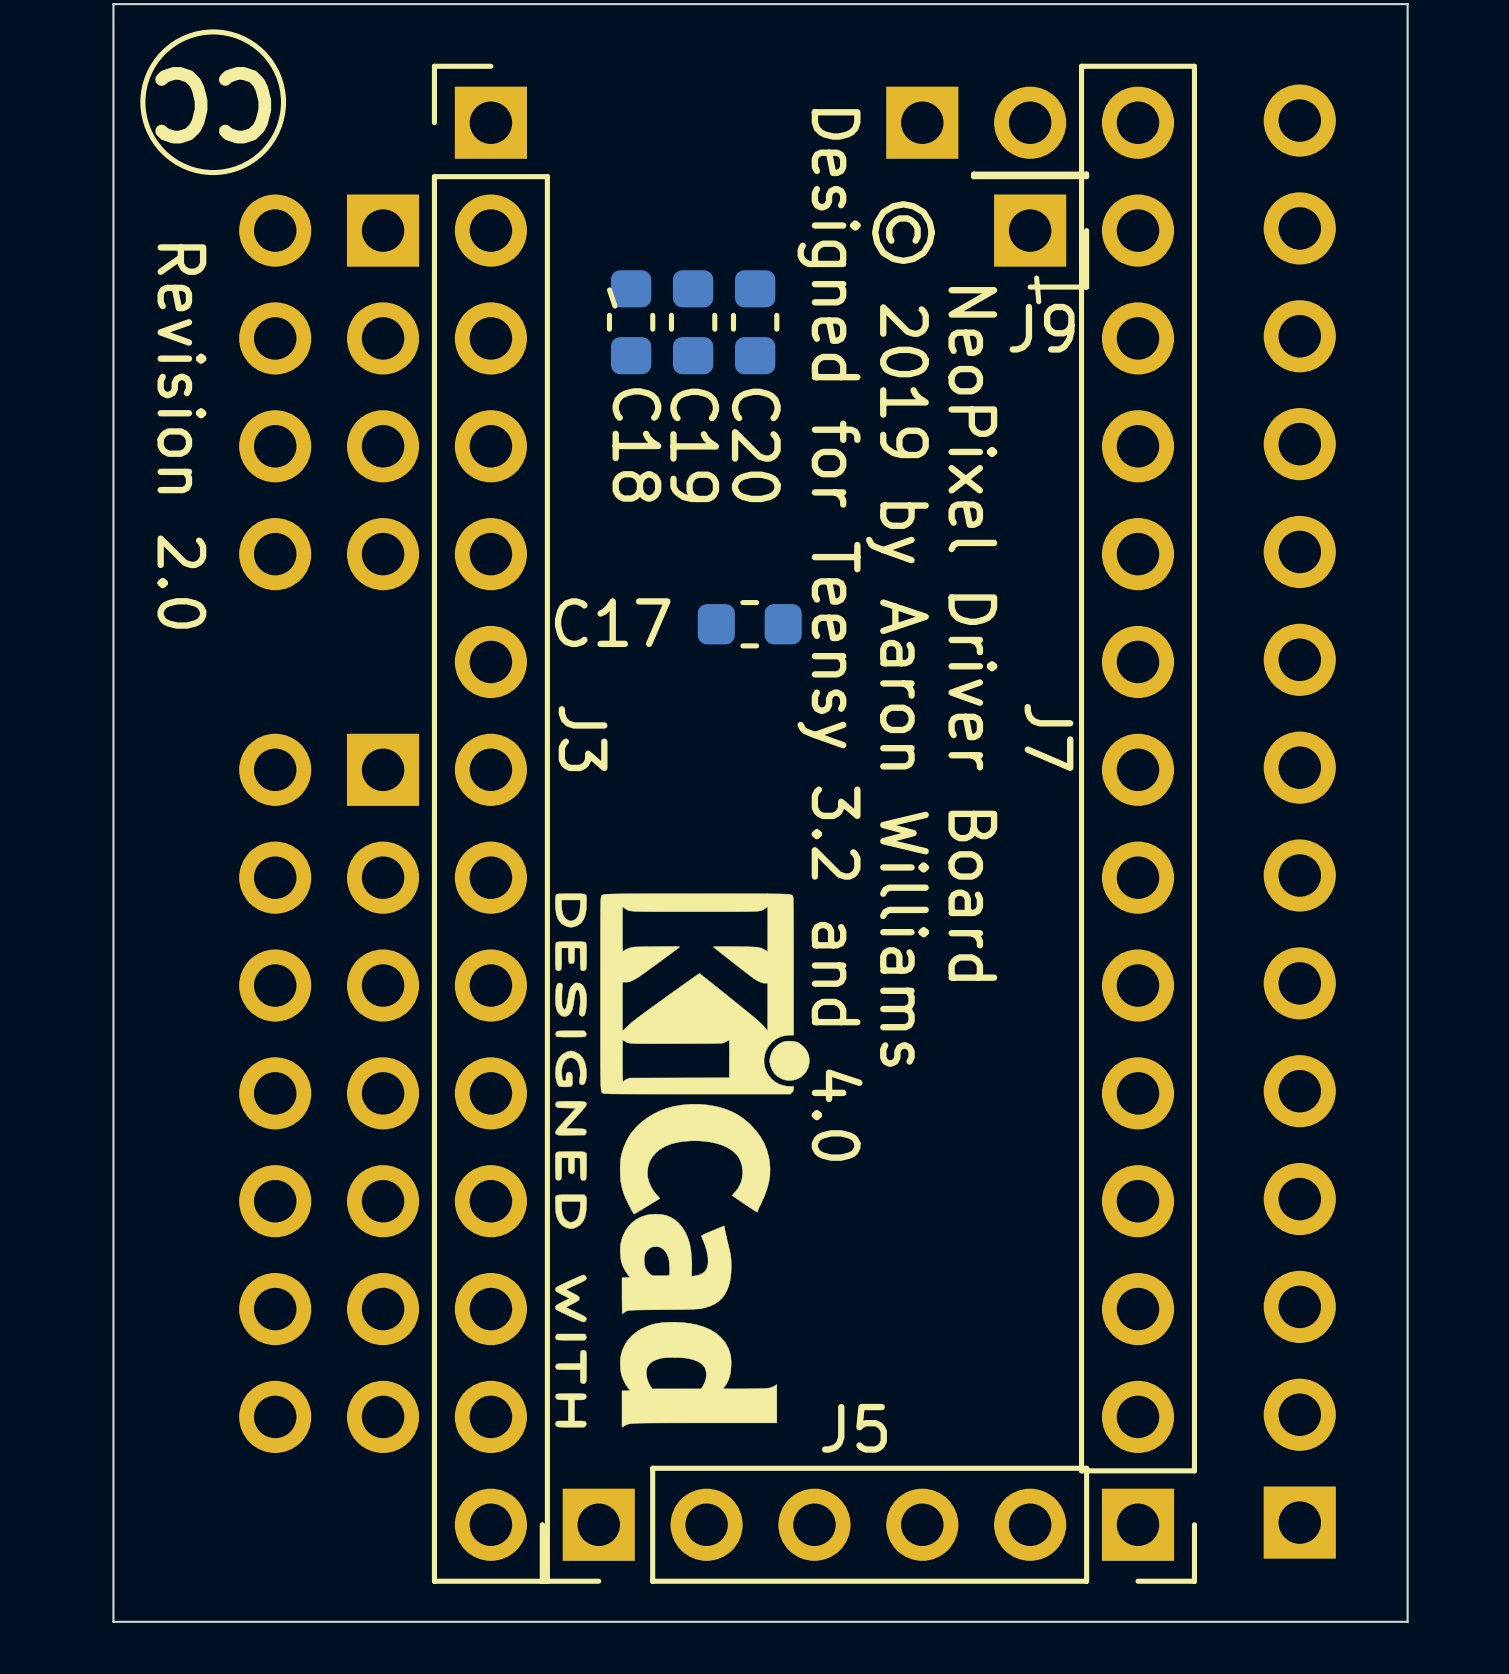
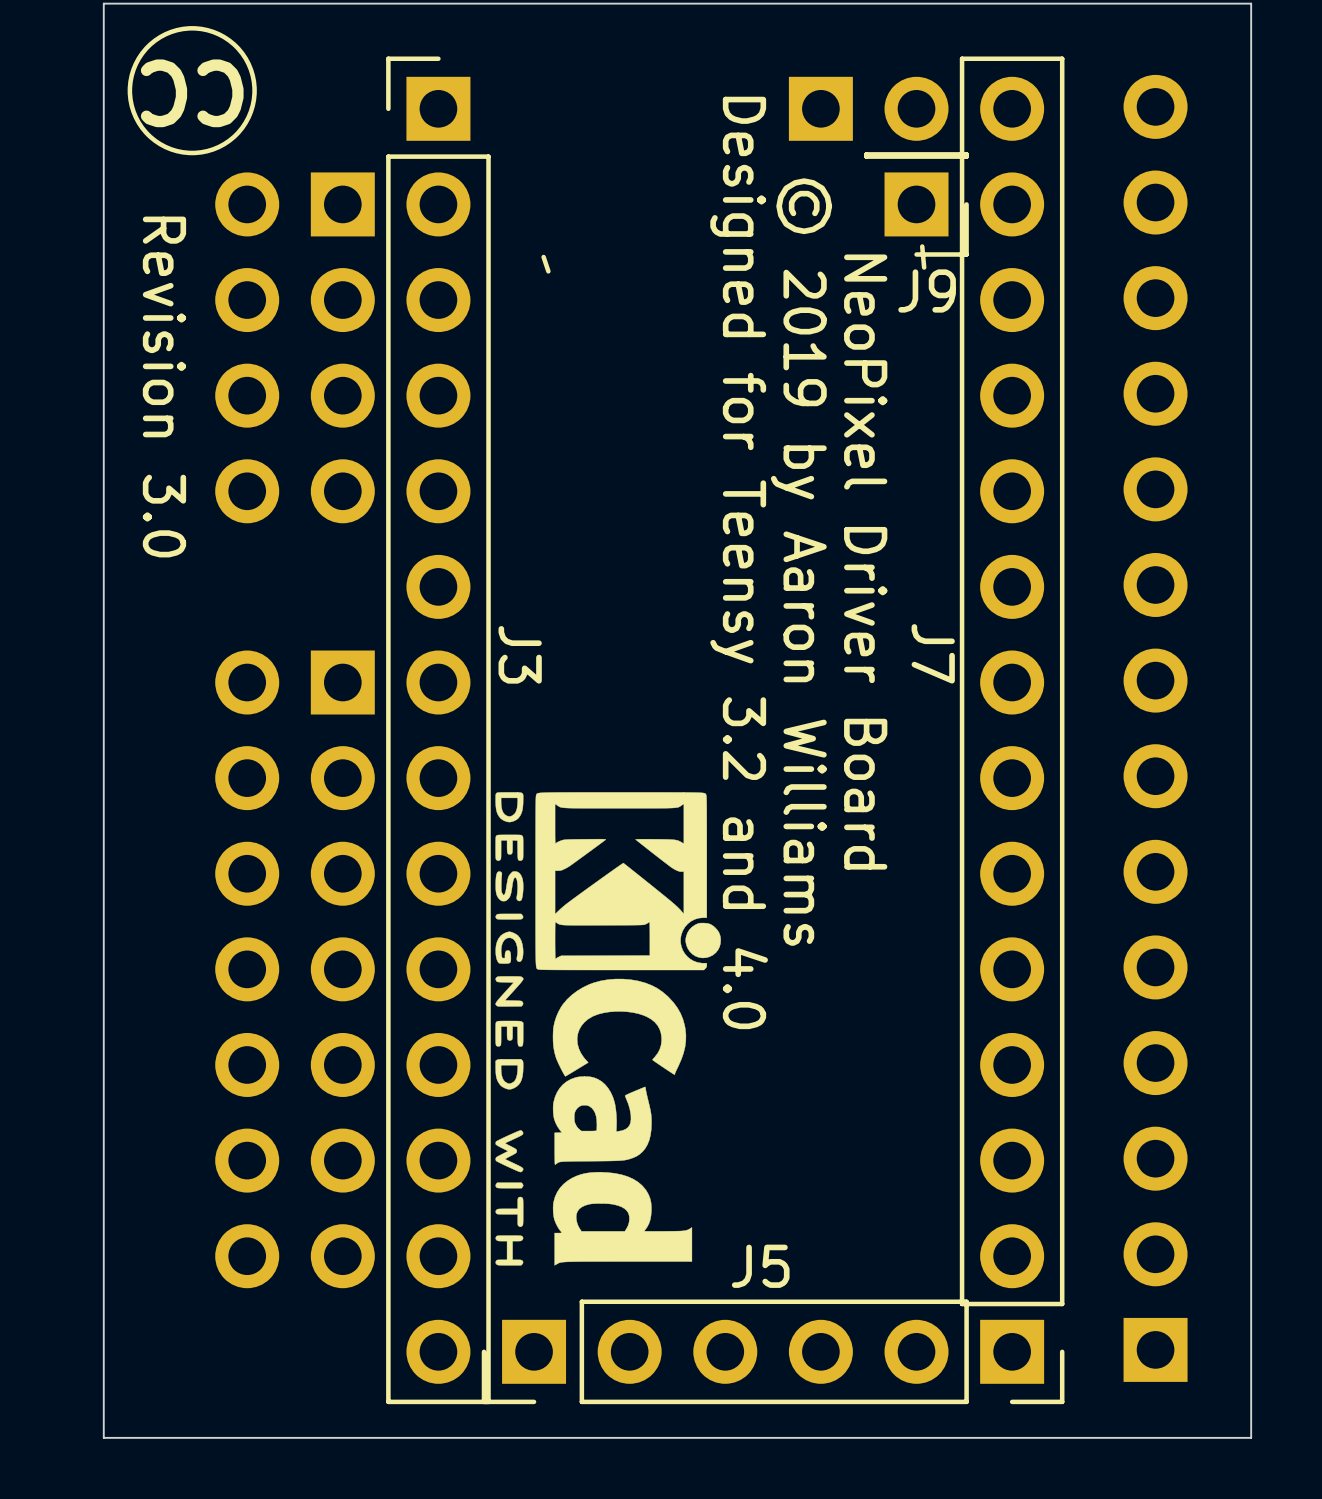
C18: (631, 322) -> none
C19: (693, 322) -> none
C20: (755, 322) -> none
text: Revision 2.0 (181, 436) -> Revision 3.0 (164, 387)
C17: (749, 624) -> none

